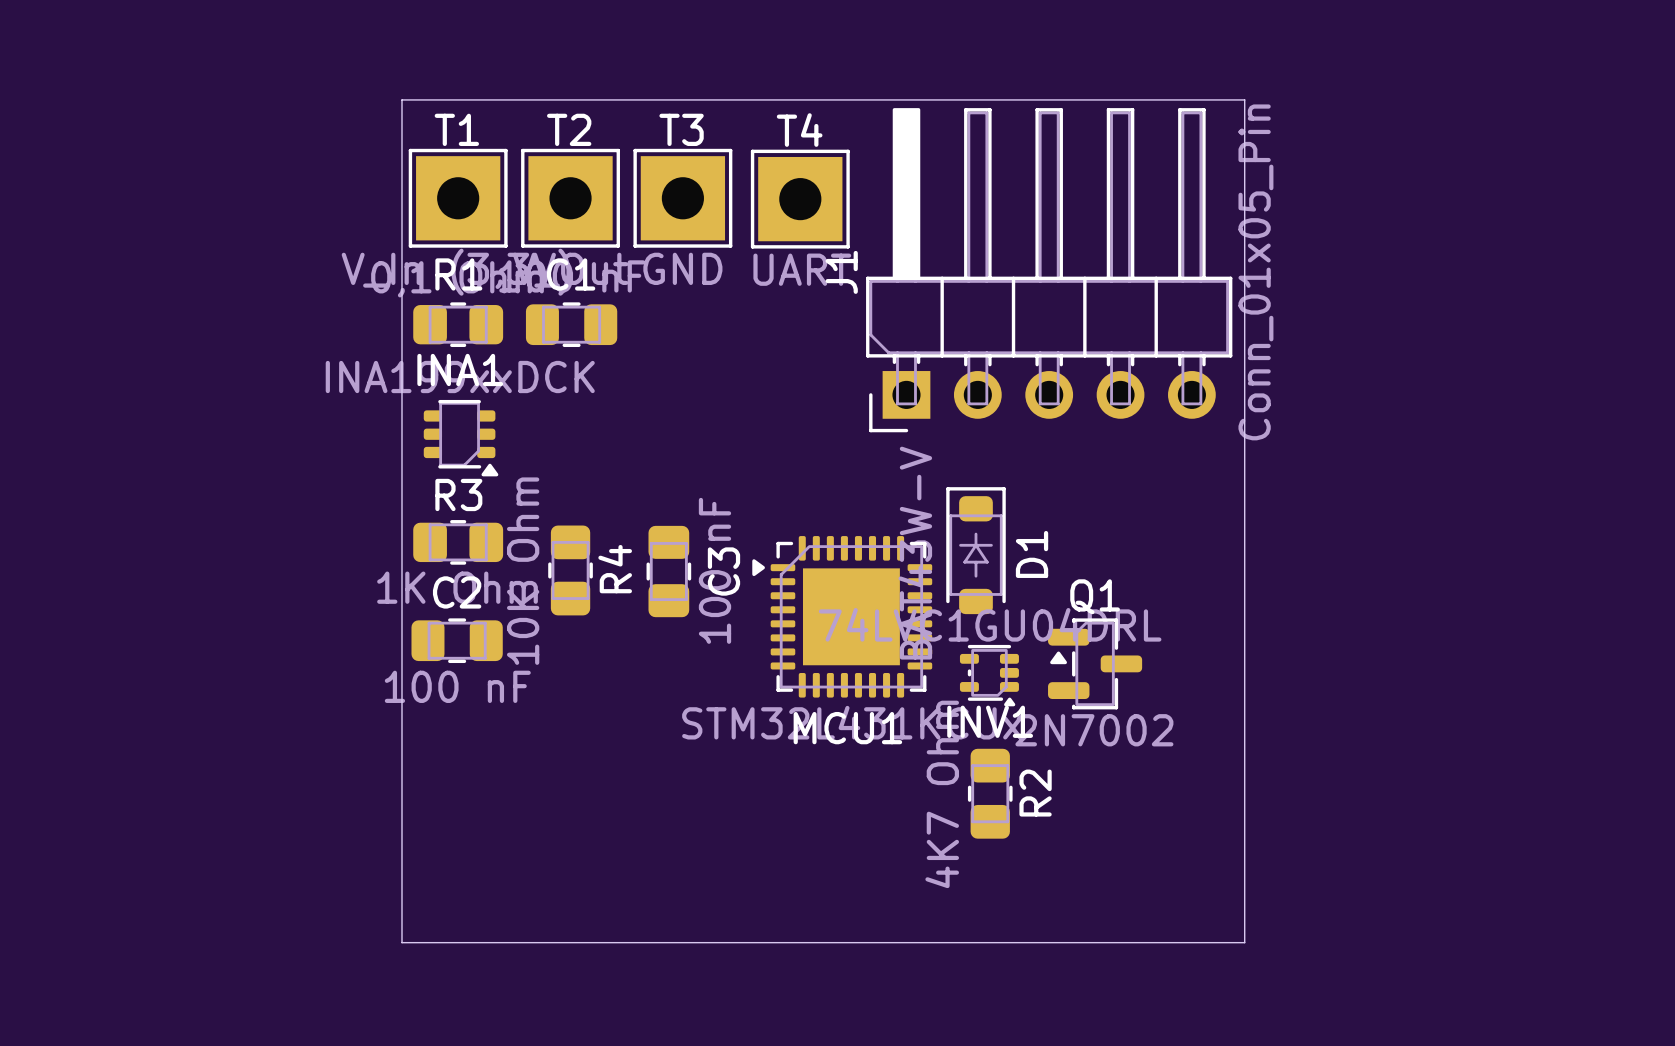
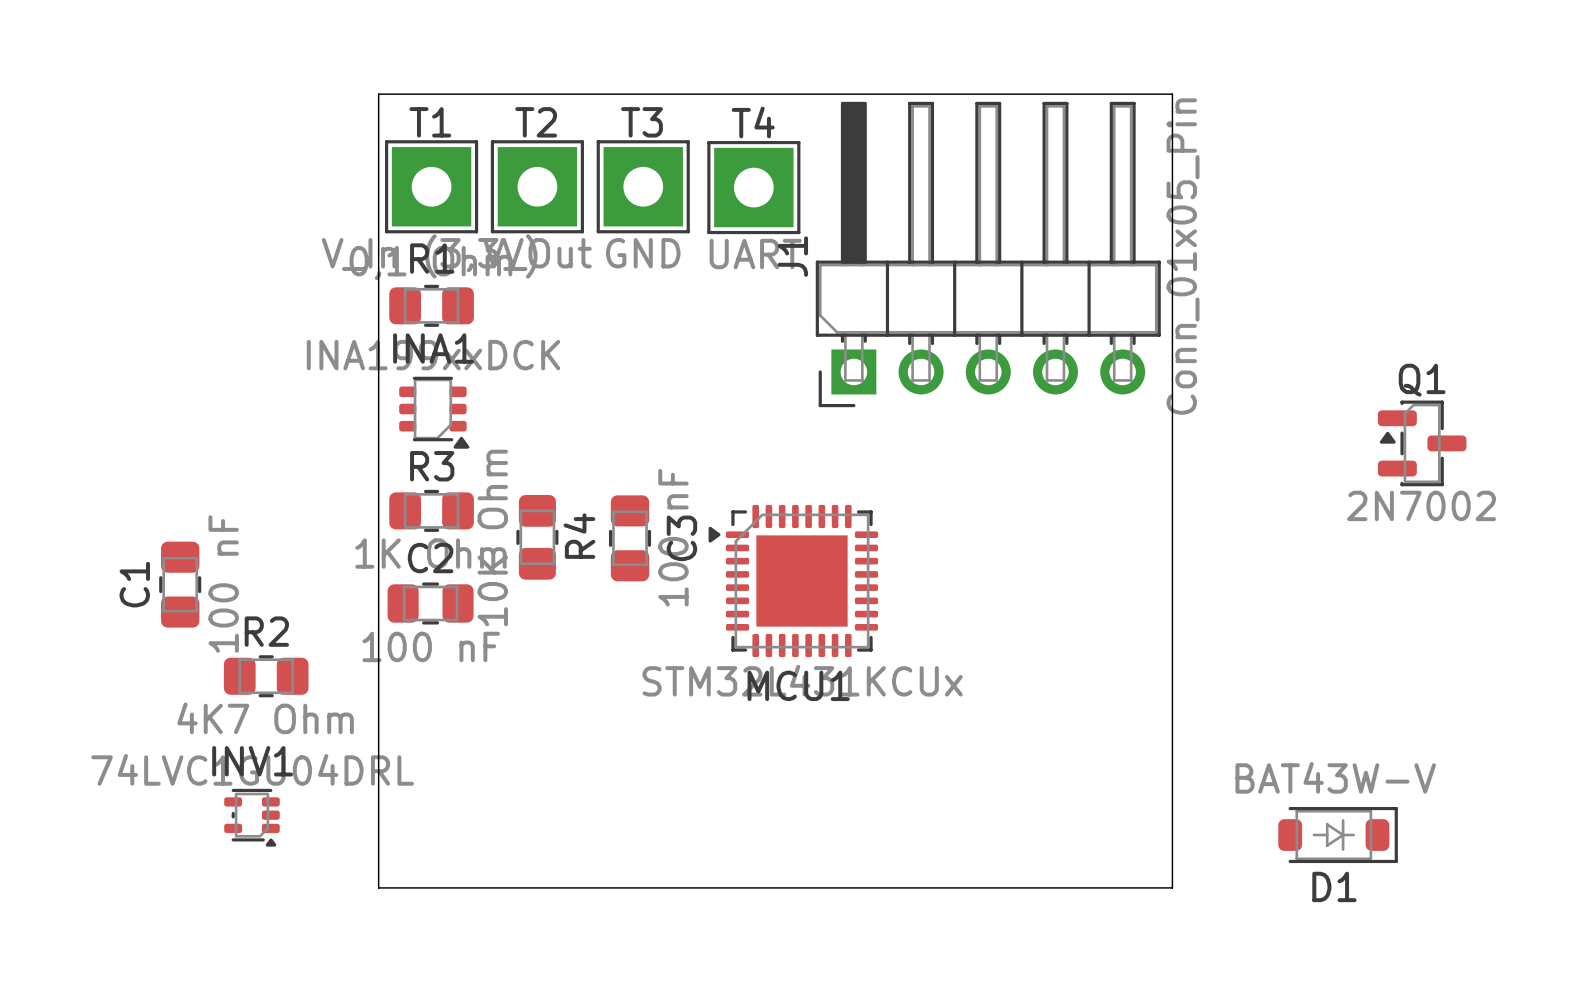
C1 name position: C1 (571, 274) -> C1 (134, 584)
C1 rotation: 0° (571, 324) -> 90° clockwise (180, 584)
C1 position: (571, 324) -> (180, 584)
D1 rotation: 0° (975, 550) -> 90° clockwise (1338, 835)
D1 position: (975, 550) -> (1338, 835)
Q1 position: (1095, 663) -> (1422, 443)
INV1 position: (989, 675) -> (251, 817)
INV1 name position: INV1 (990, 721) -> INV1 (252, 761)
R2 rotation: 0° (990, 793) -> 90° clockwise (266, 676)
R2 position: (990, 793) -> (266, 676)
R2 name position: R2 (1035, 793) -> R2 (266, 631)
R2 value position: 4K7 Ohm (942, 794) -> 4K7 Ohm (265, 718)

